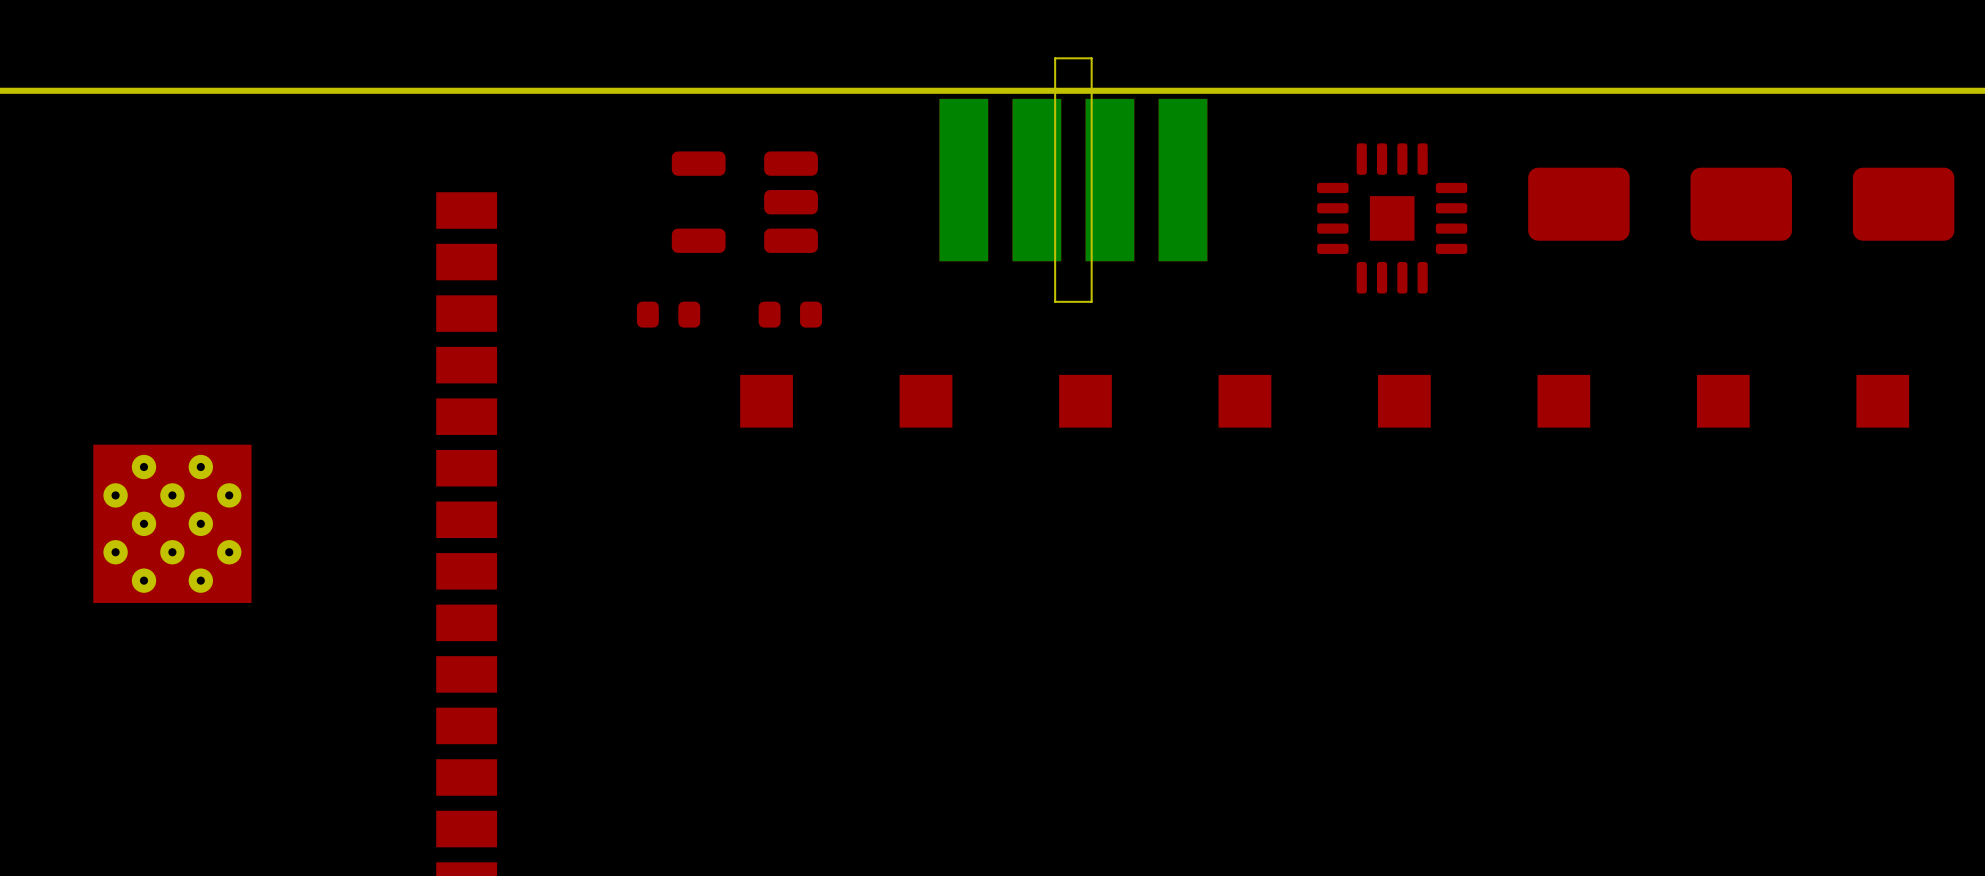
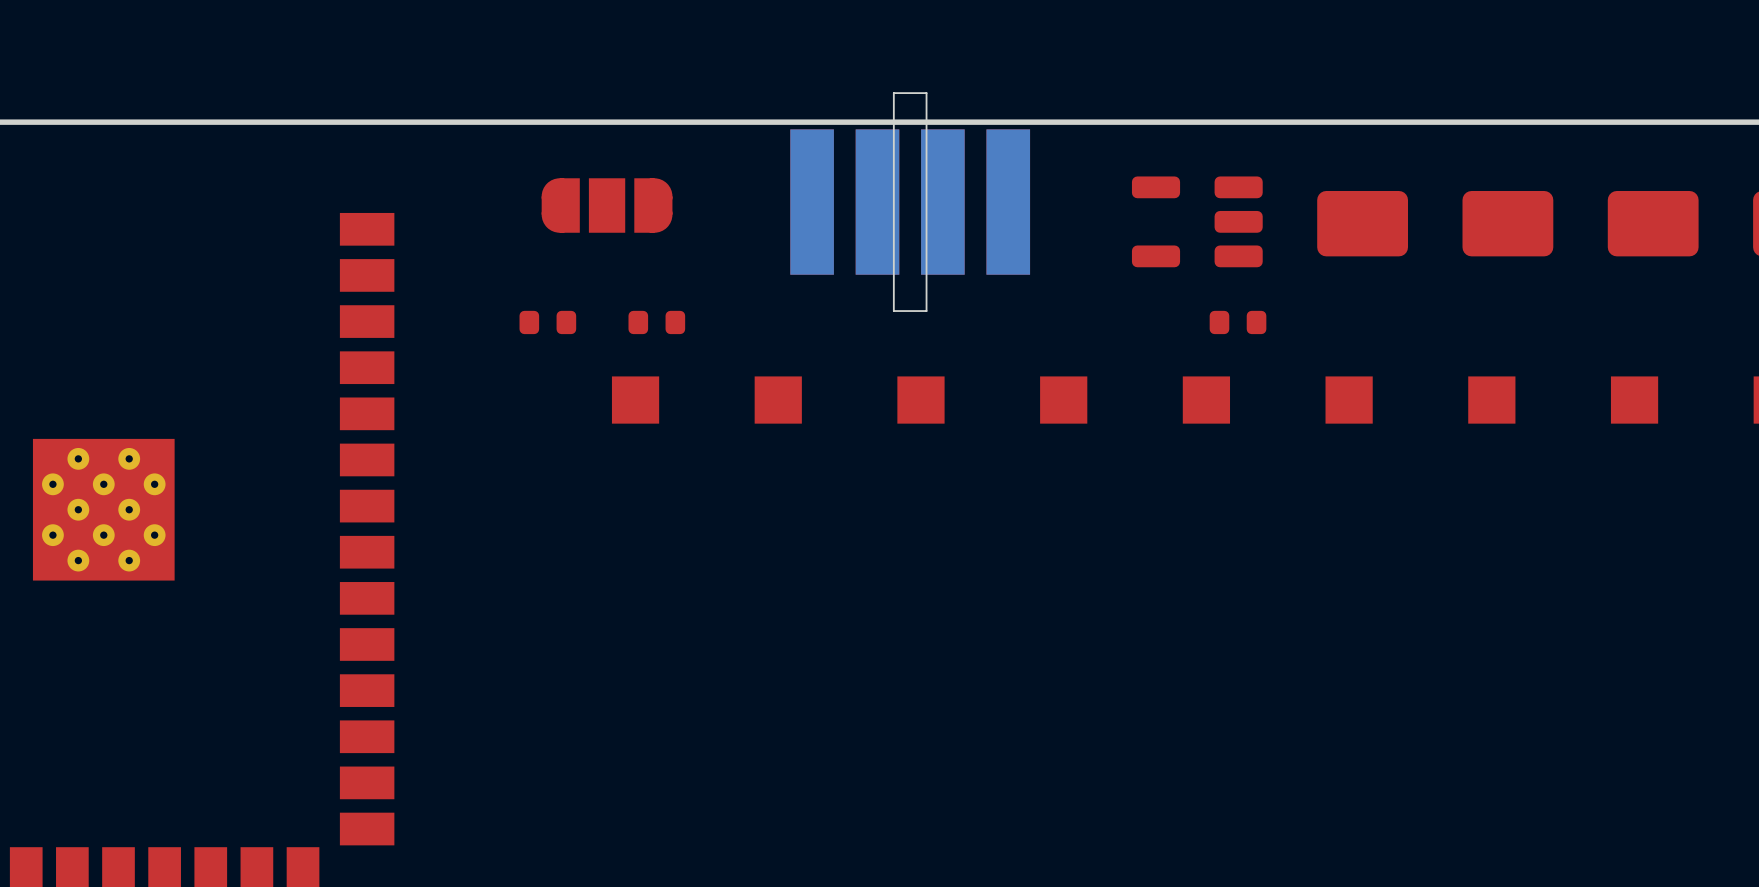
part footprint: [1317, 143, 1468, 294] -> [1131, 176, 1263, 268]
part footprint: [671, 151, 818, 253] -> [541, 178, 673, 233]
part: none -> (1238, 322)

